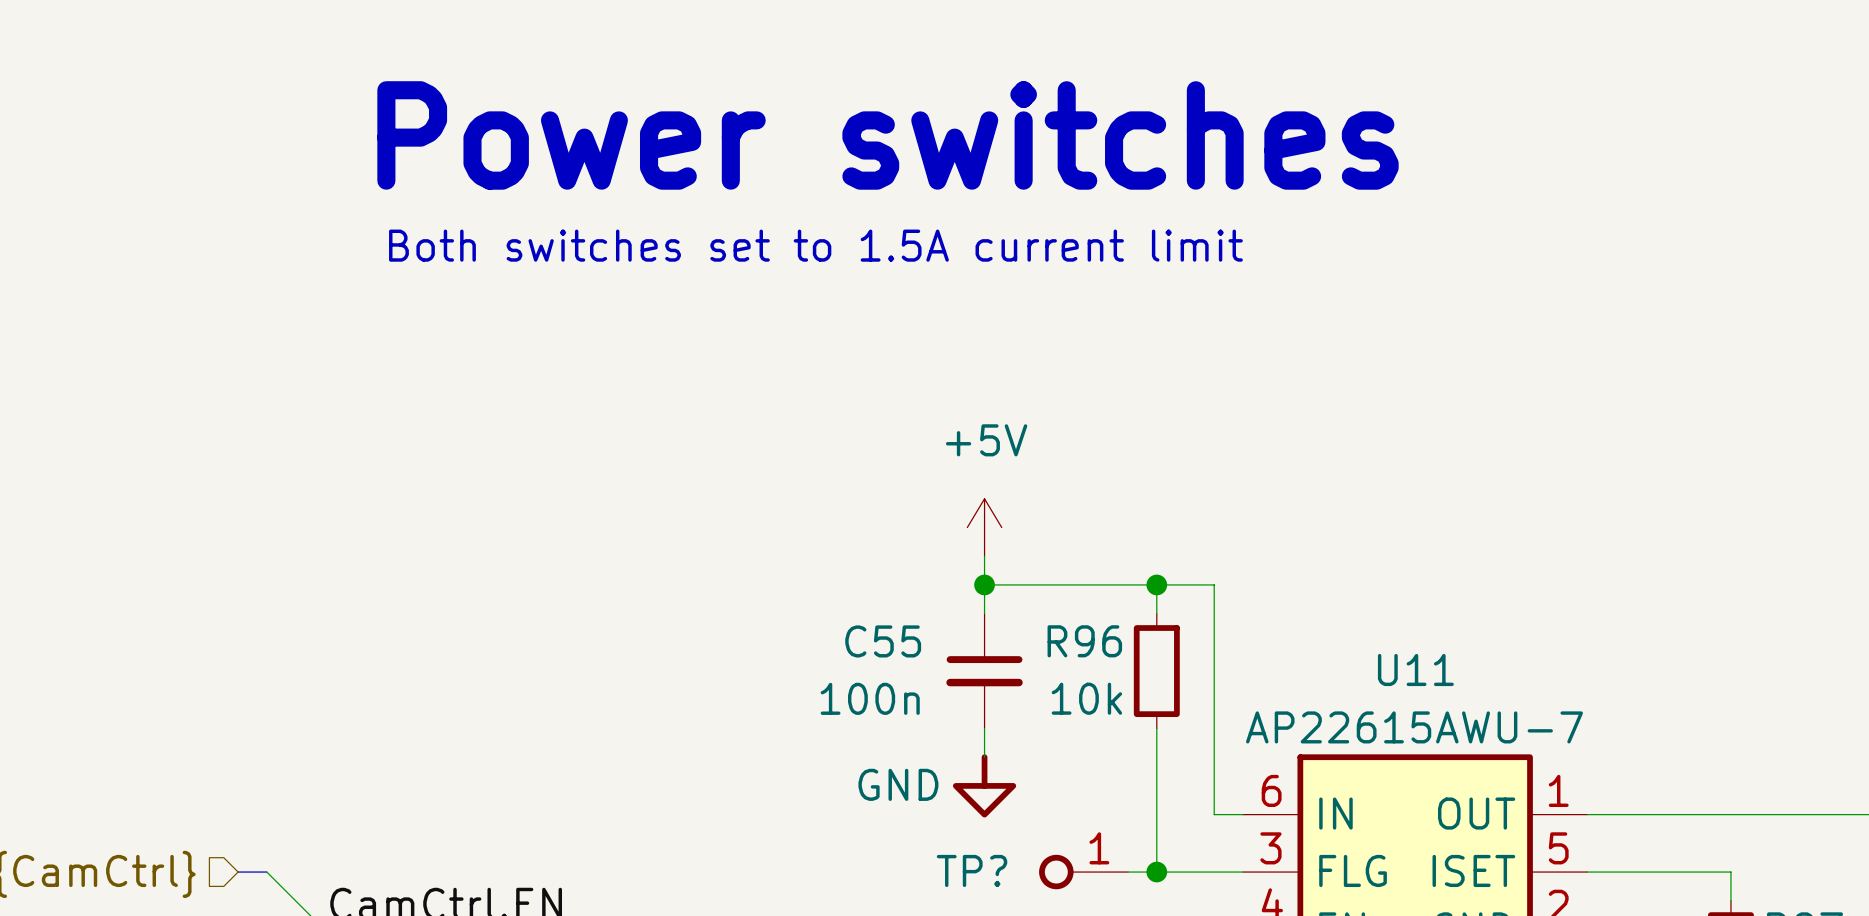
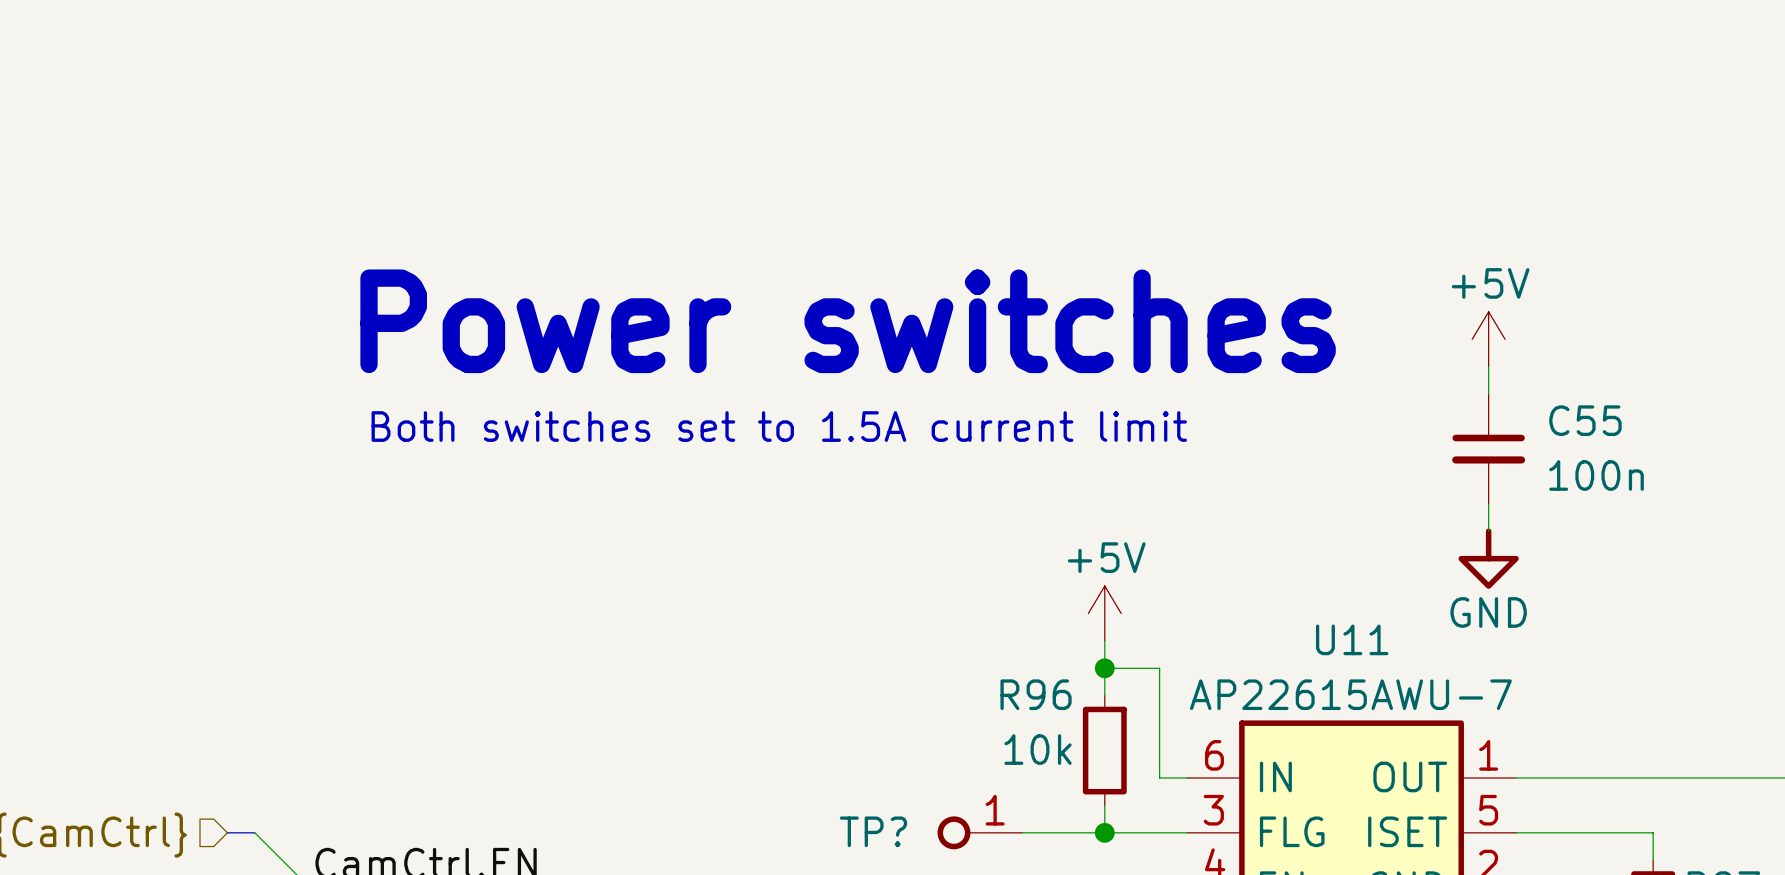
text position: Power switches (888, 135) -> Power switches (848, 321)
text position: Both switches set to 1.5A current limit (815, 245) -> Both switches set to 1.5A current limit (779, 426)
power symbol: none -> +5V (1488, 339)
wire: none -> (1488, 366) (1488, 394)
power symbol text position: +5V (986, 440) -> +5V (1106, 557)
power symbol position: +5V (984, 527) -> +5V (1104, 613)
wire: (984, 556) (984, 613) -> none
wire: (984, 584) (1214, 584) (1214, 699) -> (1104, 668) (1159, 668)
junction: (984, 584) -> none
wire: (1156, 584) (1156, 613) -> (1488, 503) (1488, 531)
junction: (1156, 584) -> none
power symbol: none -> GND (1488, 558)
C55 name position: C55 (883, 641) -> C55 (1585, 420)
R96 name position: R96 (1084, 641) -> R96 (1036, 694)
C55 position: (984, 671) -> (1488, 448)
R96 position: (1156, 671) -> (1104, 750)
C55 text position: 100n (870, 698) -> 100n (1596, 475)
R96 text position: 10k (1086, 698) -> 10k (1038, 749)
junction: none -> (1104, 668)
wire: (984, 728) (984, 757) -> none
wire: (1156, 728) (1156, 843) -> (1104, 695) (1104, 640)
power symbol: GND (984, 785) -> none
TP? position: (1083, 872) -> (980, 832)

